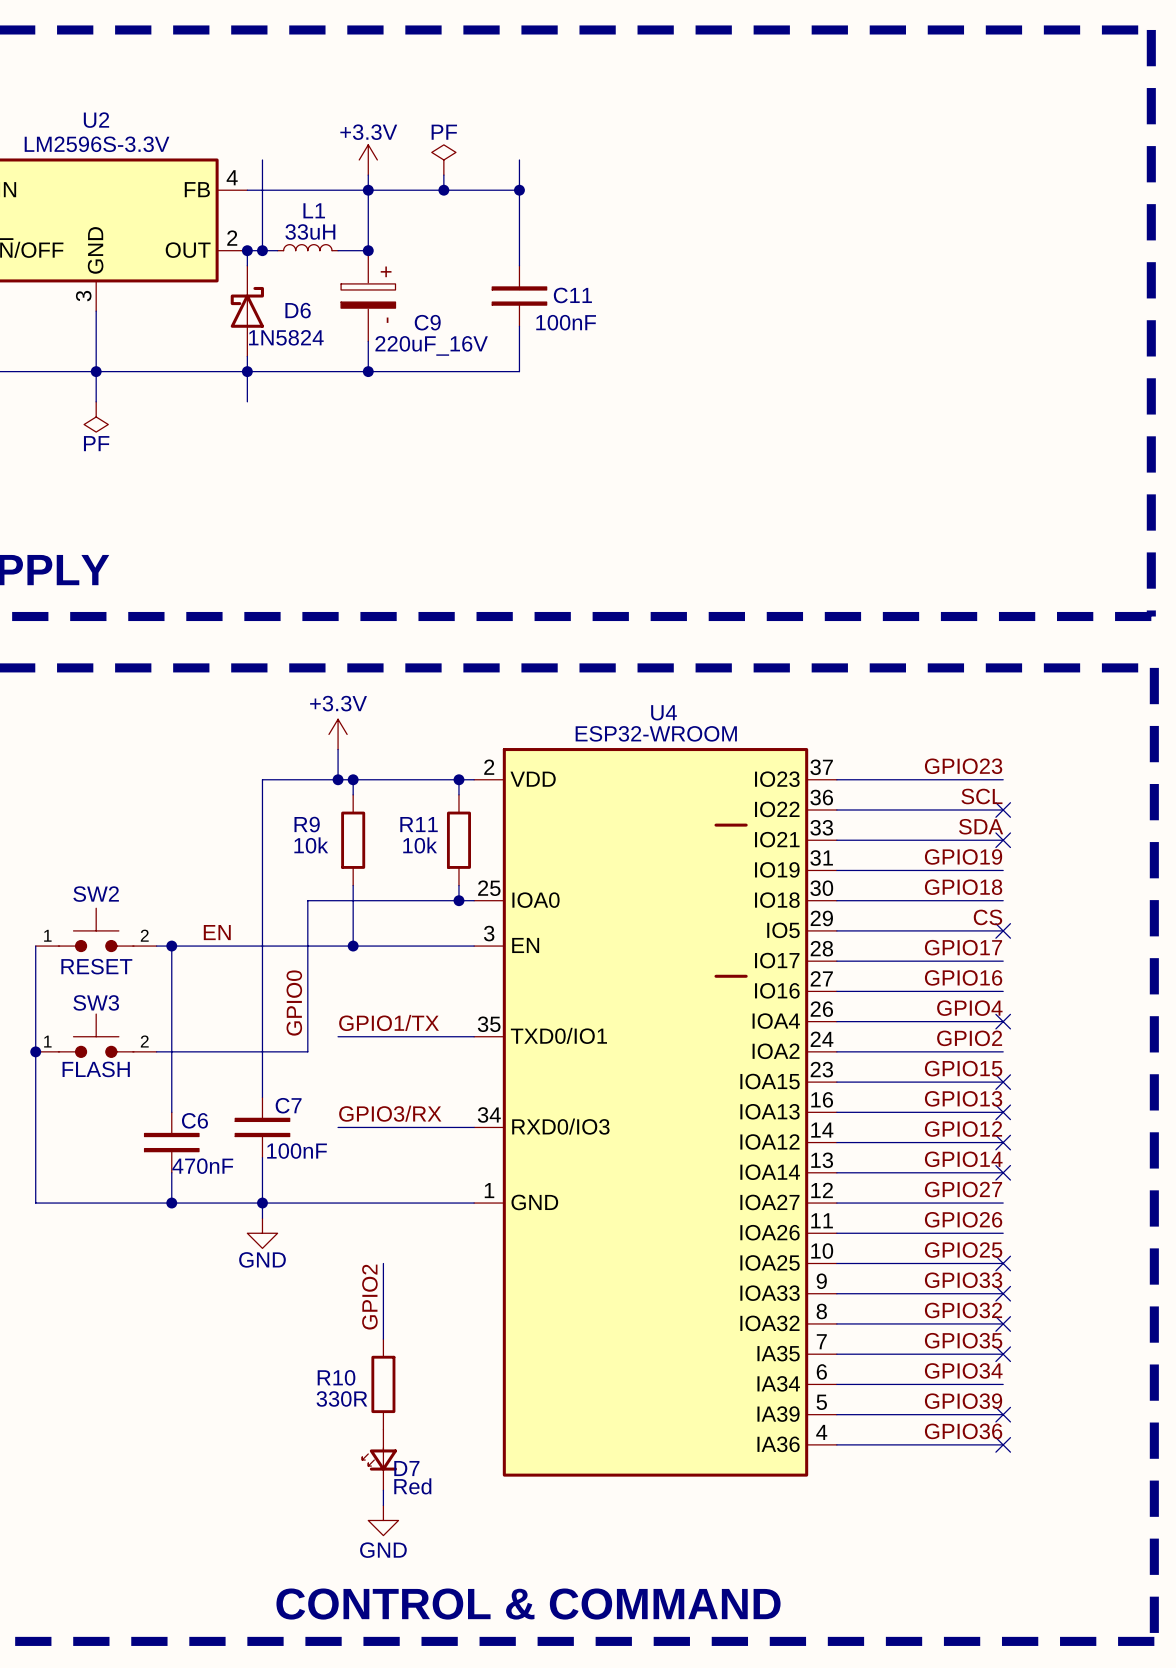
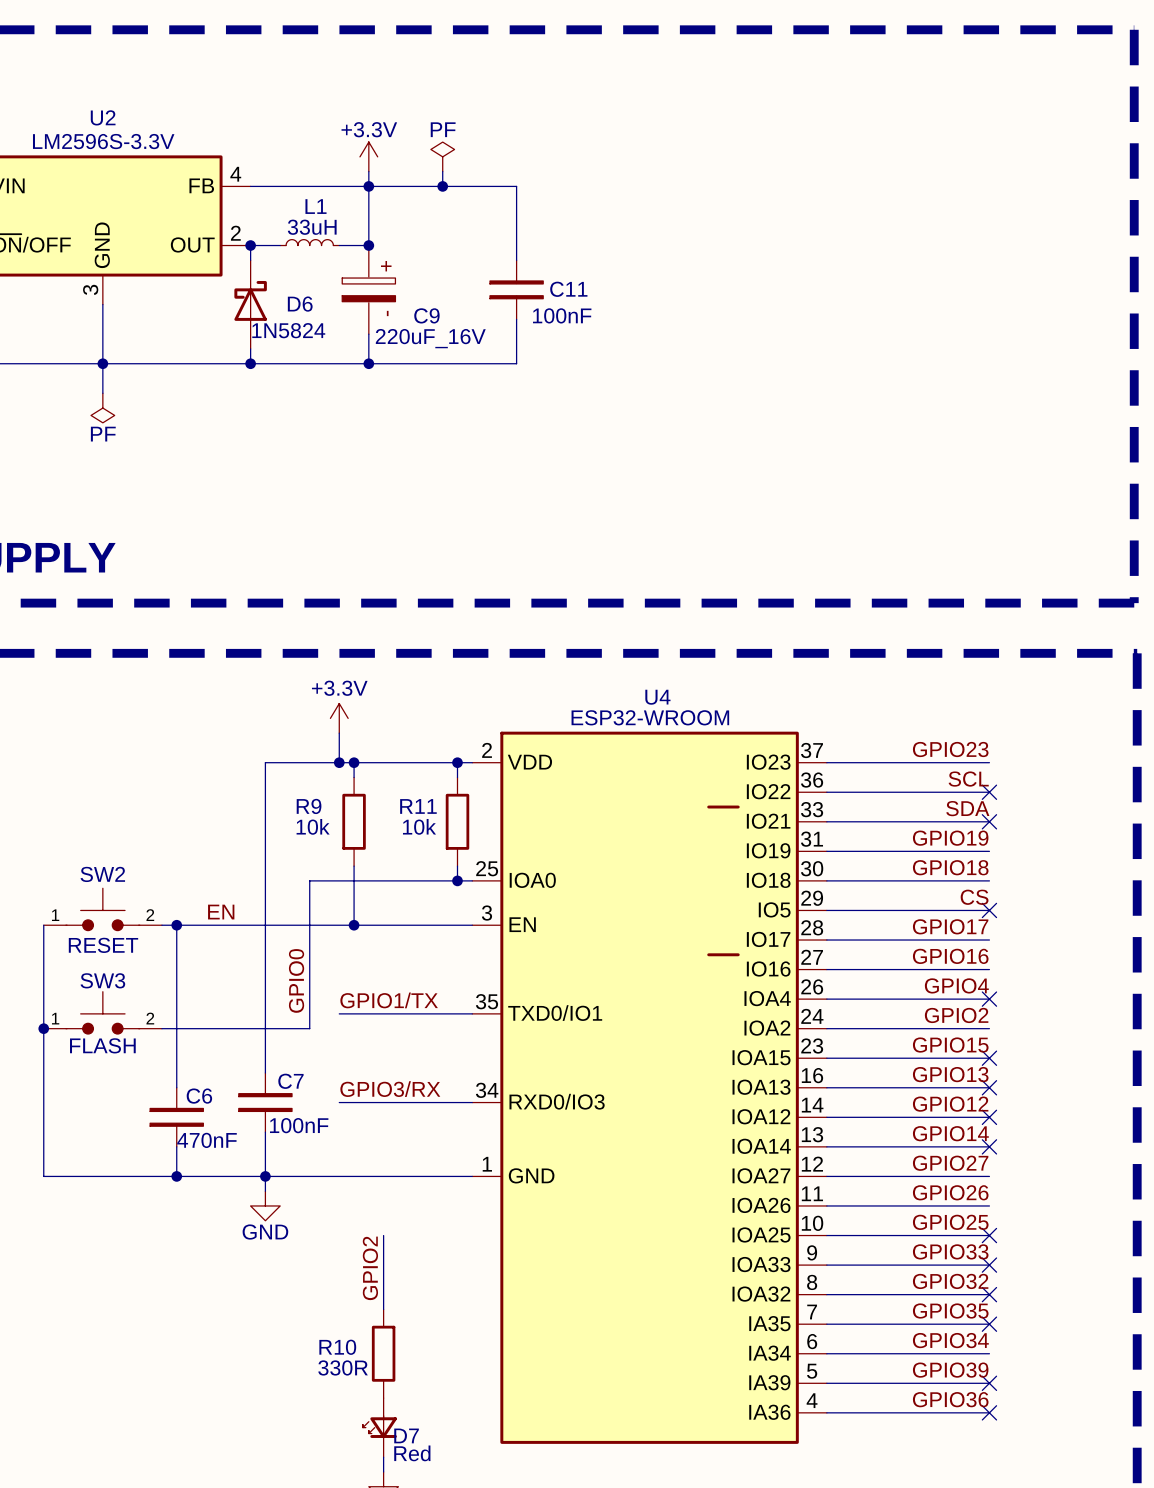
wire: (262, 159) (262, 250) -> none
wire: (519, 159) (519, 190) -> none
junction: (519, 190) -> none
junction: (262, 250) -> none
wire: (247, 371) (247, 401) -> none

